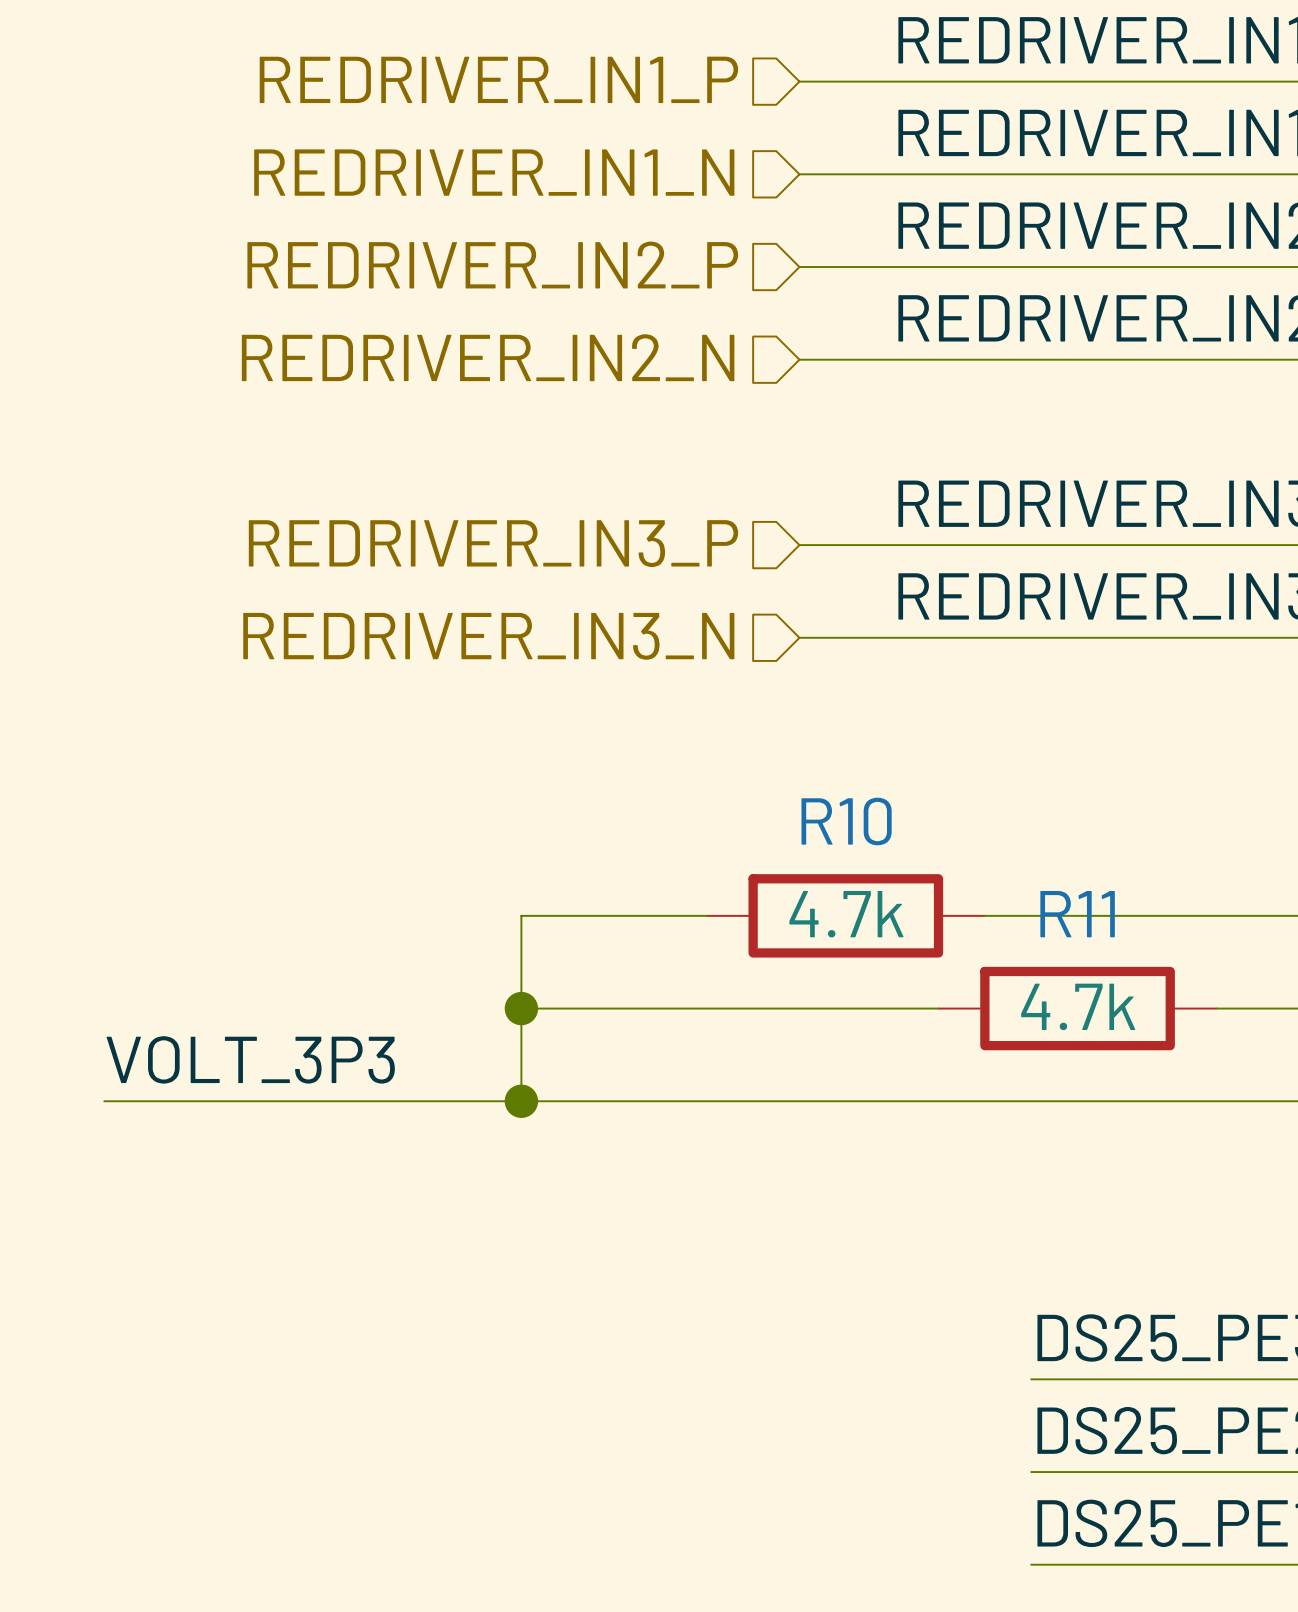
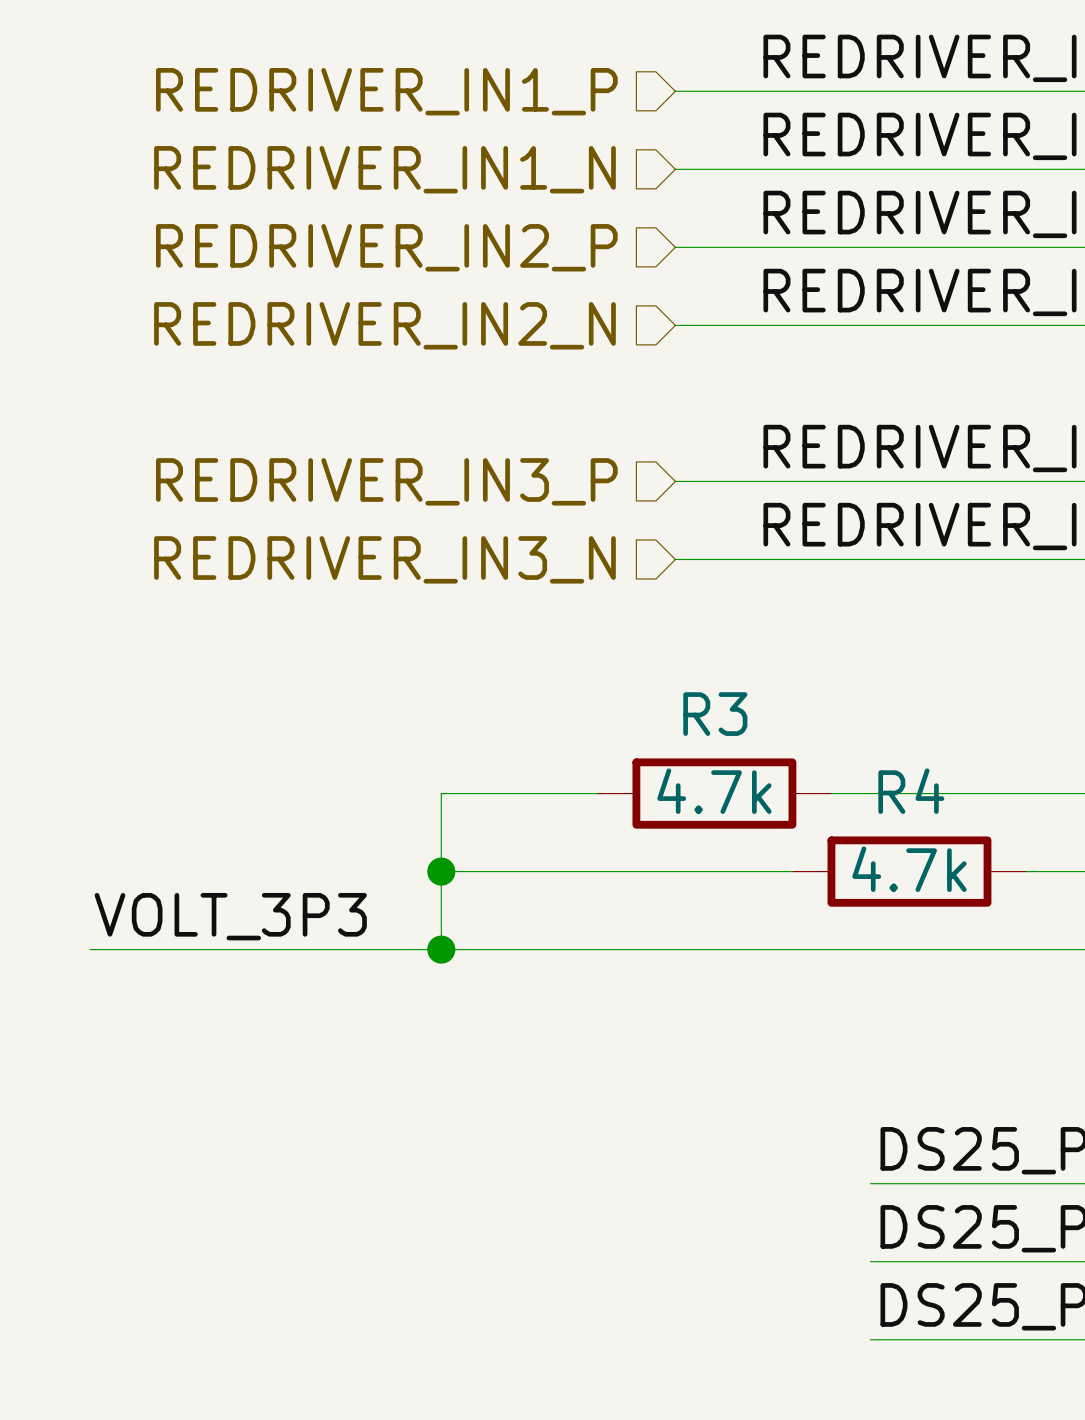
R10 name: R10 (846, 821) -> R3 (715, 714)
R11 name: R11 (1077, 914) -> R4 (911, 791)

